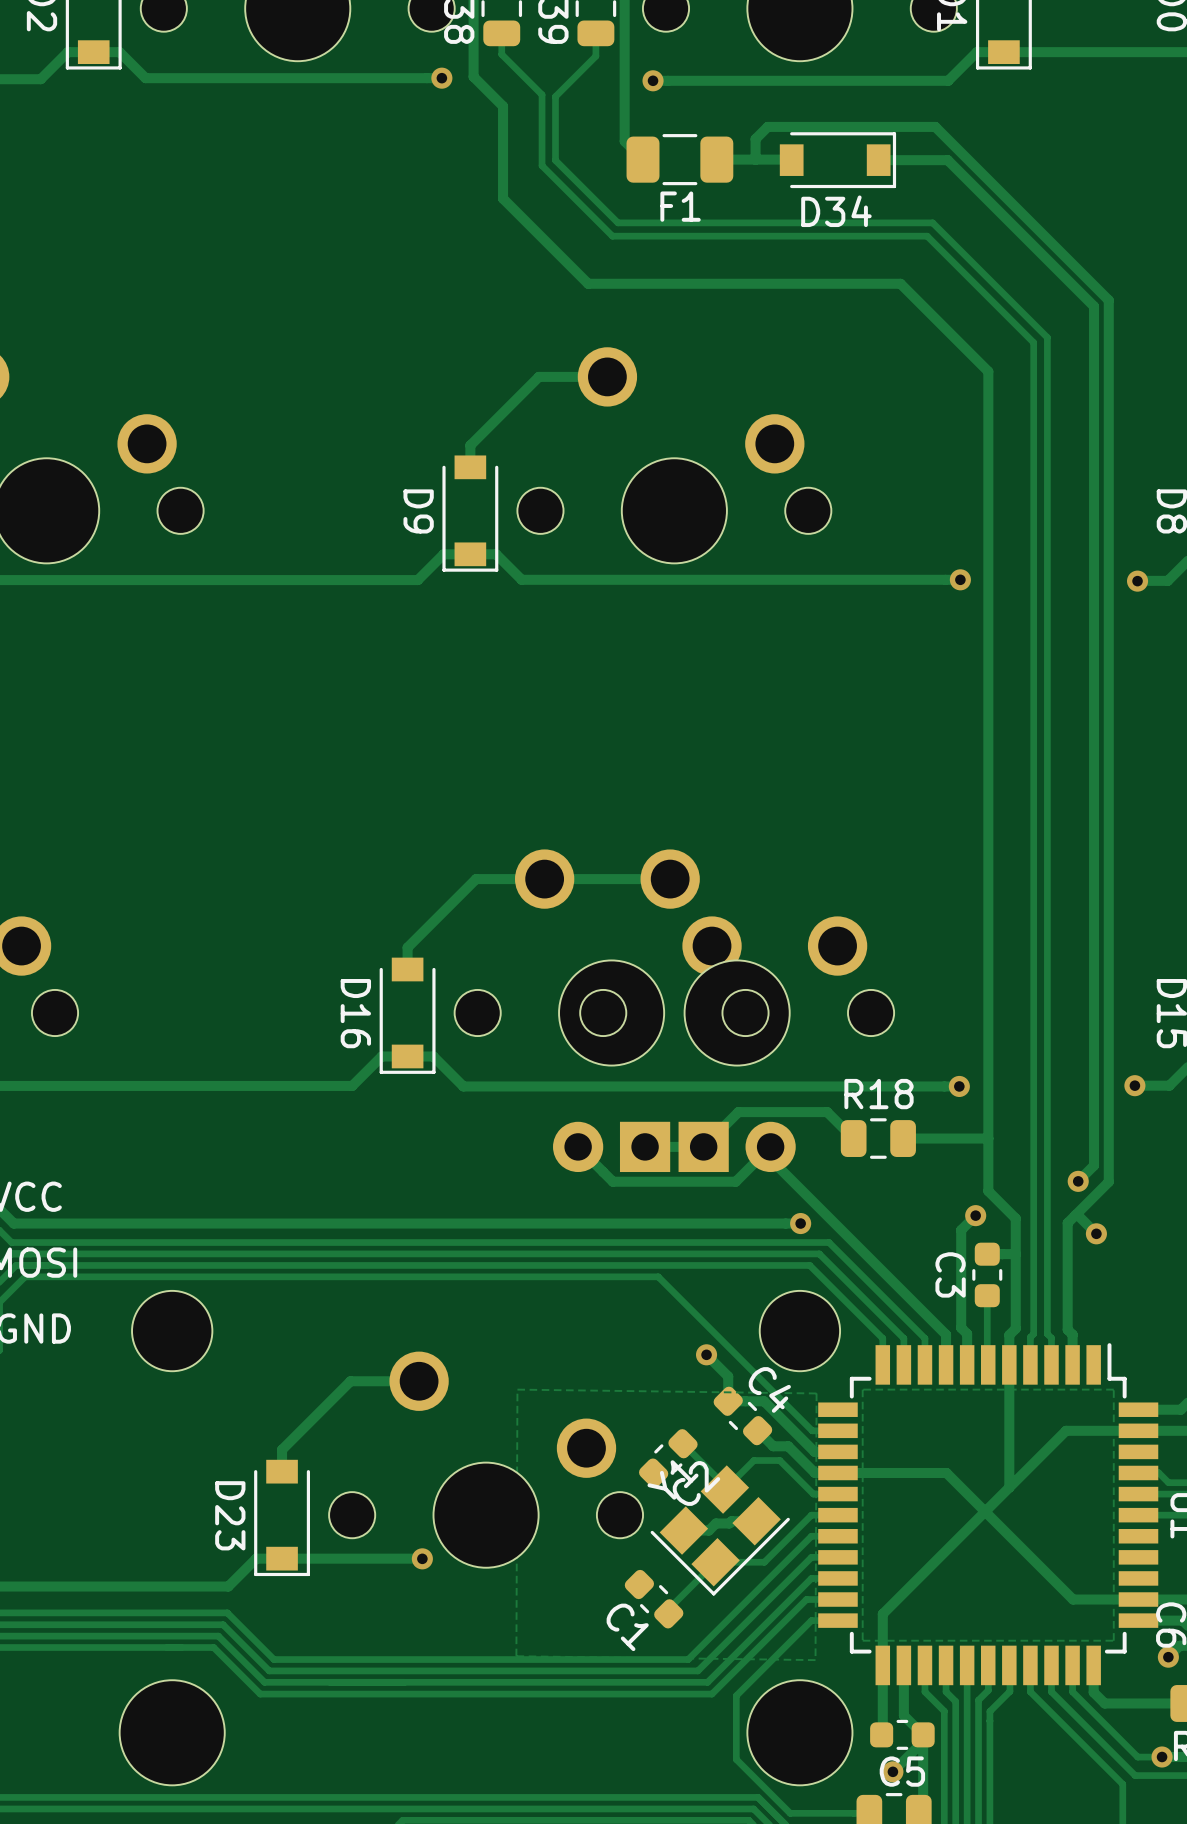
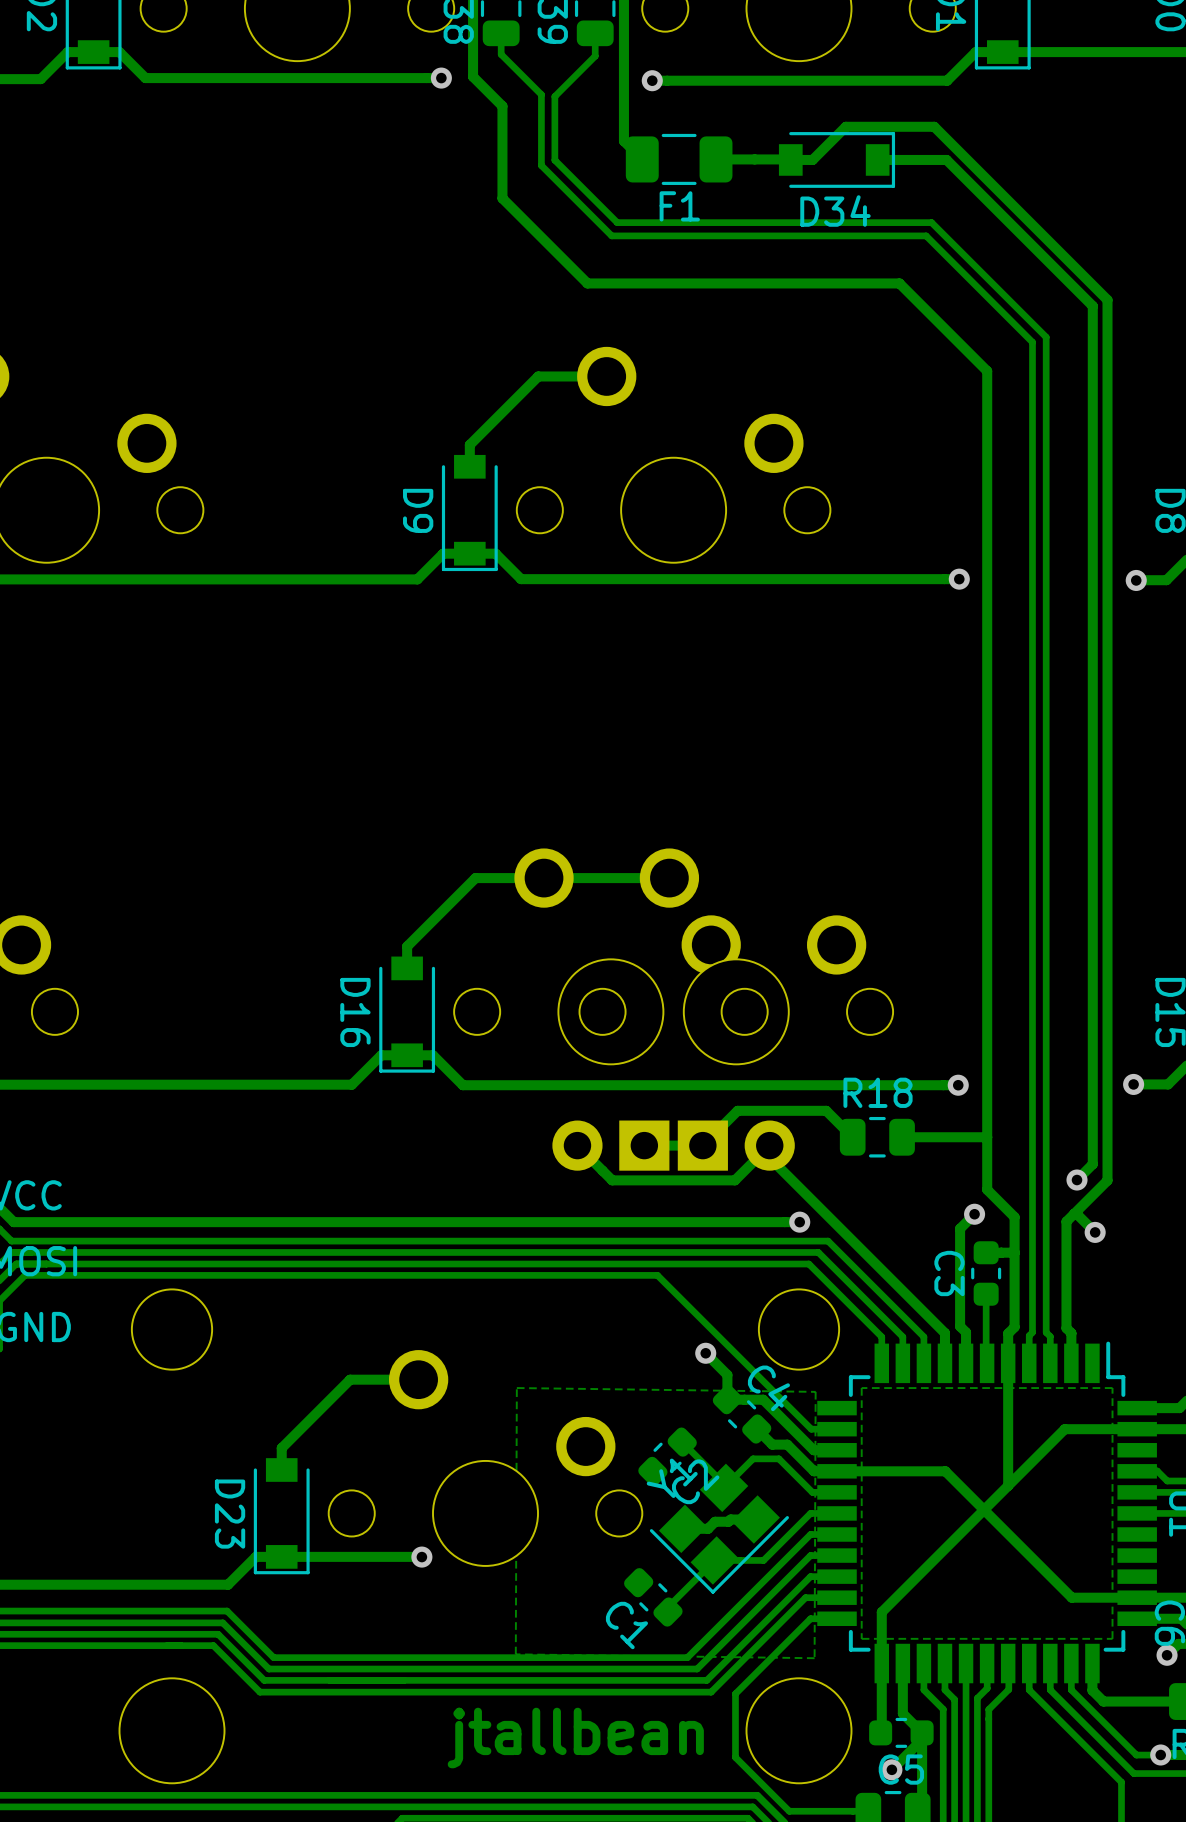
track: (846, 126) (767, 126) (755, 139) (755, 159) -> (845, 126) (812, 159) (790, 159)
text: none -> jtallbean (575, 1737)

